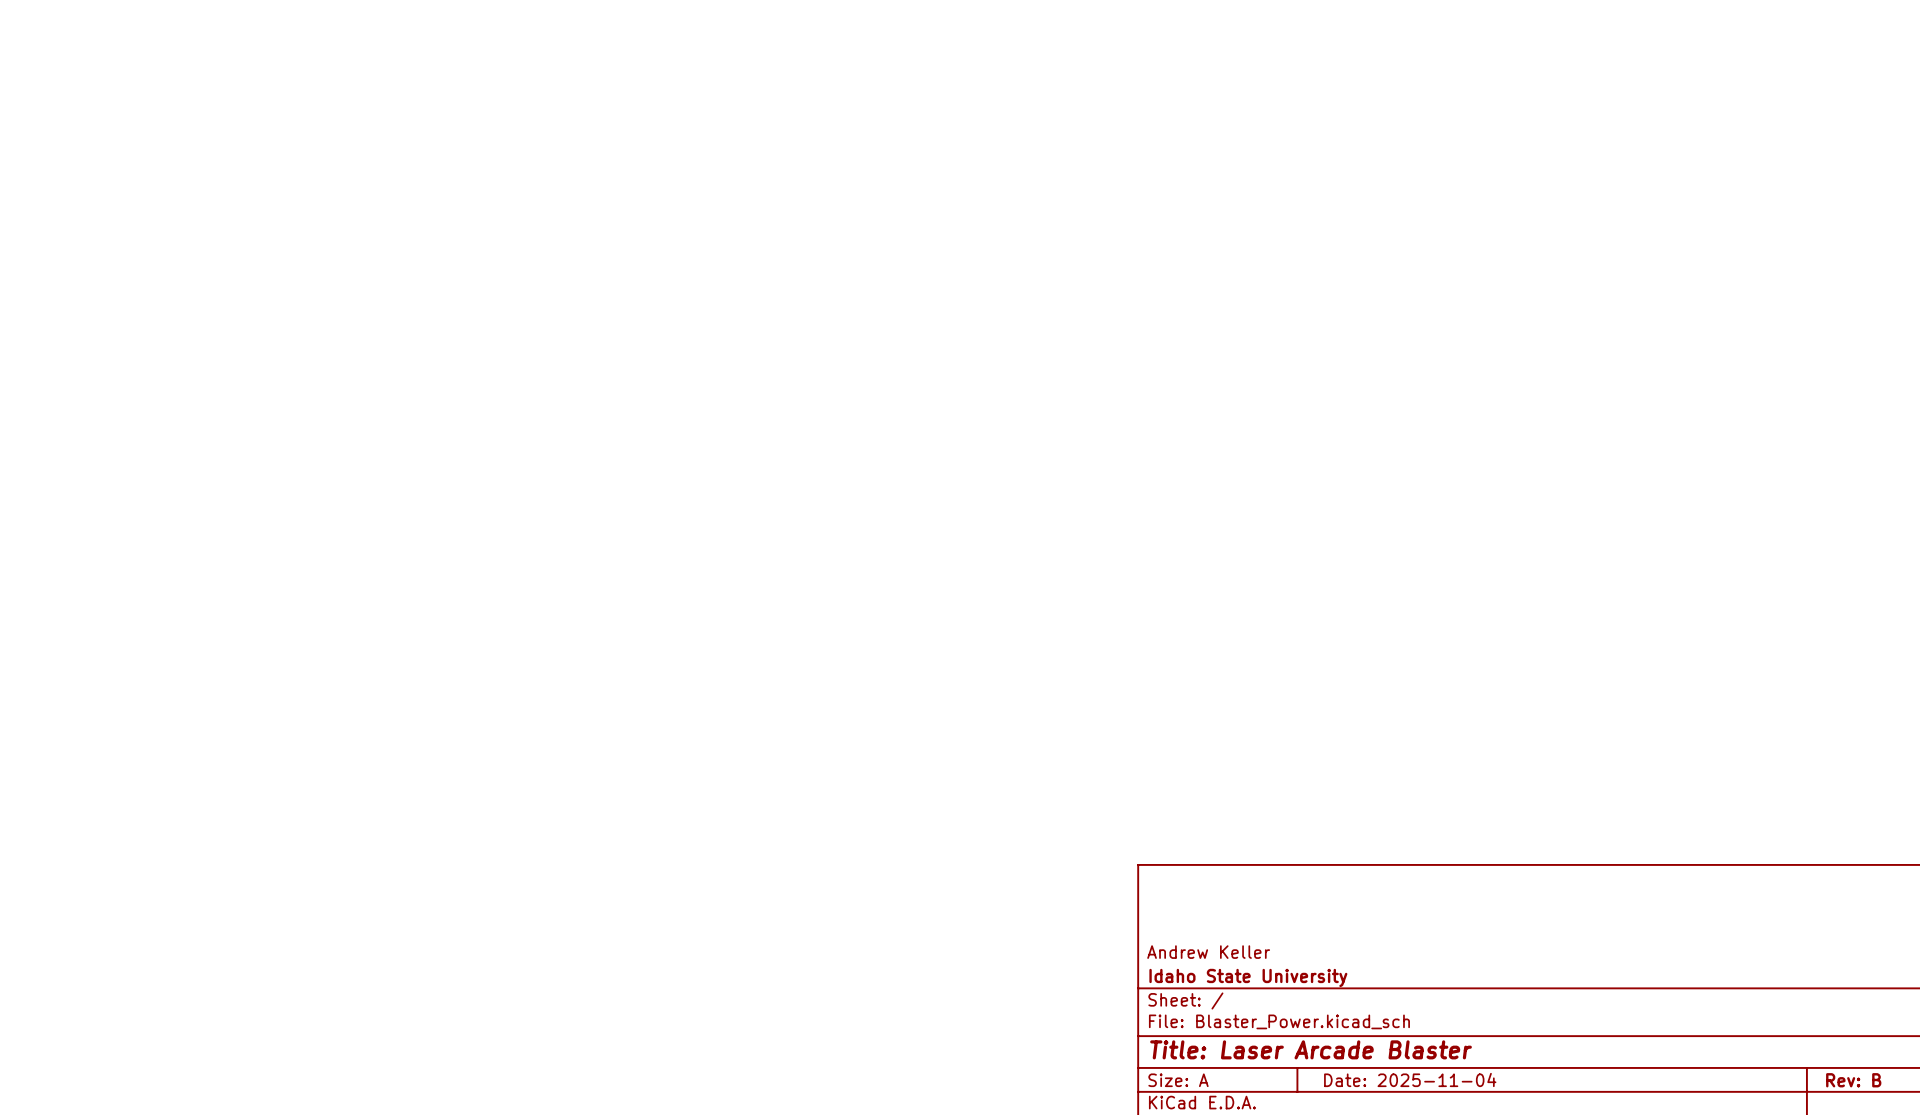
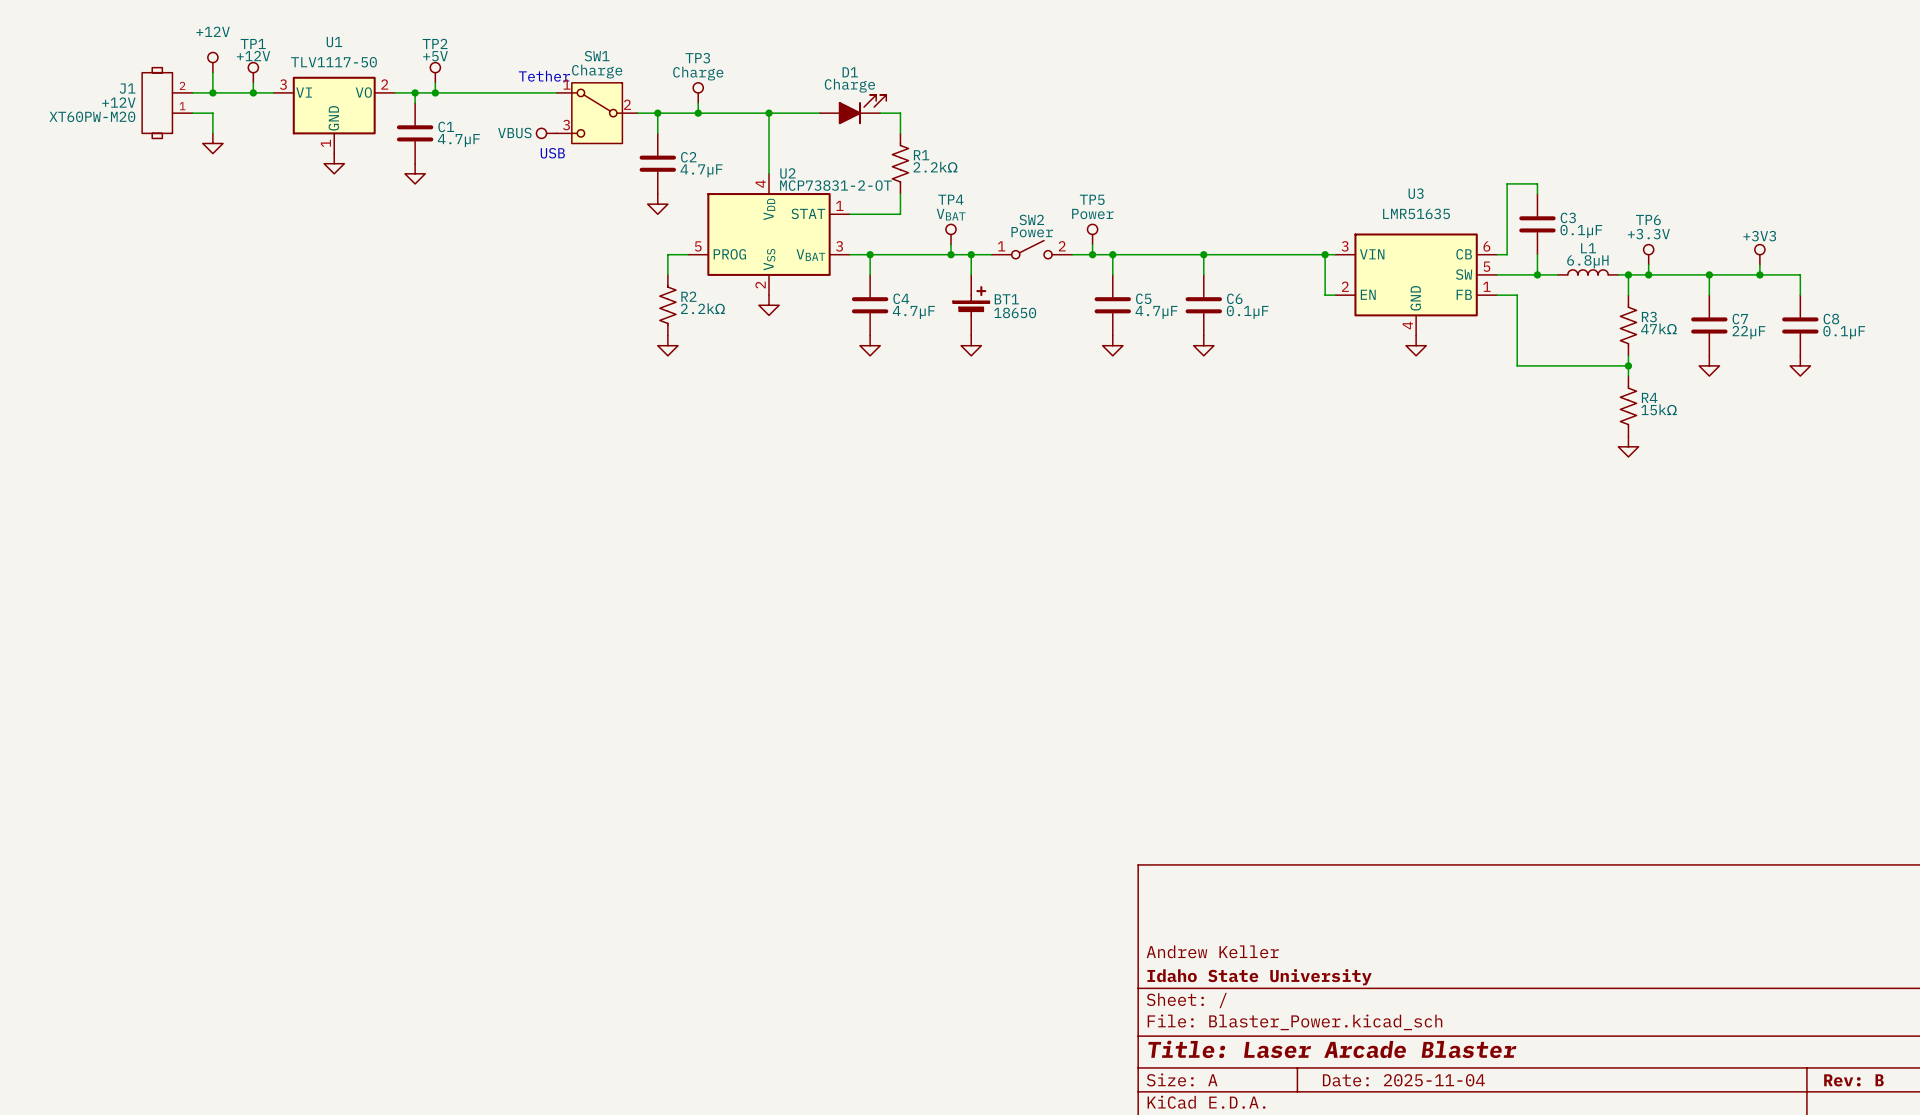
power symbol: none -> +12V (212, 62)
wire: none -> (212, 72) (212, 92)
TP1: none -> +12V (253, 72)
TP2: none -> +5V (435, 72)
text: none -> Tether (544, 76)
wire: none -> (253, 82) (253, 92)
wire: none -> (435, 82) (435, 92)
wire: none -> (192, 92) (273, 92)
junction: none -> (212, 92)
junction: none -> (253, 92)
wire: none -> (394, 92) (556, 92)
wire: none -> (415, 92) (415, 103)
junction: none -> (415, 92)
junction: none -> (435, 92)
TP3: none -> Charge (698, 92)
J1: none -> +12V (167, 103)
wire: none -> (698, 103) (698, 113)
D1: none -> Charge (852, 109)
wire: none -> (192, 113) (212, 113) (212, 133)
SW1: none -> Charge (597, 113)
wire: none -> (637, 113) (819, 113)
wire: none -> (657, 113) (657, 133)
junction: none -> (657, 113)
junction: none -> (698, 113)
wire: none -> (769, 113) (769, 173)
junction: none -> (769, 113)
wire: none -> (880, 113) (900, 113) (900, 133)
U1: none -> TLV1117-50 (334, 115)
C1: none -> 4.7µF (415, 133)
power symbol: none -> VBUS (546, 133)
power symbol: none -> (212, 143)
text: none -> USB (552, 153)
power symbol: none -> (334, 163)
C2: none -> 4.7µF (657, 163)
R1: none -> 2.2kΩ (900, 163)
power symbol: none -> (415, 173)
wire: none -> (900, 194) (900, 214) (849, 214)
wire: none -> (1537, 194) (1537, 183) (1507, 183) (1507, 254) (1497, 254)
power symbol: none -> (657, 204)
C3: none -> 0.1µF (1537, 224)
U2: none -> MCP73831-2-OT (769, 234)
TP4: none -> VBAT (951, 234)
TP5: none -> Power (1092, 234)
wire: none -> (951, 244) (951, 254)
wire: none -> (1092, 244) (1092, 254)
SW2: none -> Power (1031, 249)
wire: none -> (688, 254) (667, 254) (667, 274)
wire: none -> (849, 254) (991, 254)
wire: none -> (870, 254) (870, 274)
junction: none -> (870, 254)
junction: none -> (951, 254)
wire: none -> (971, 254) (971, 274)
junction: none -> (971, 254)
wire: none -> (1072, 254) (1335, 254)
junction: none -> (1092, 254)
wire: none -> (1112, 254) (1112, 274)
junction: none -> (1112, 254)
wire: none -> (1203, 254) (1203, 274)
junction: none -> (1203, 254)
wire: none -> (1325, 254) (1325, 295) (1335, 295)
junction: none -> (1325, 254)
wire: none -> (1537, 254) (1537, 274)
TP6: none -> +3.3V (1648, 254)
power symbol: none -> +3V3 (1759, 254)
wire: none -> (1648, 264) (1648, 274)
wire: none -> (1759, 264) (1759, 274)
L1: none -> 6.8µH (1588, 272)
wire: none -> (1497, 274) (1557, 274)
junction: none -> (1537, 274)
wire: none -> (1618, 274) (1800, 274) (1800, 295)
wire: none -> (1628, 274) (1628, 295)
junction: none -> (1628, 274)
junction: none -> (1648, 274)
wire: none -> (1709, 274) (1709, 295)
junction: none -> (1709, 274)
junction: none -> (1759, 274)
U3: none -> LMR51635 (1416, 284)
wire: none -> (1497, 295) (1517, 295) (1517, 365) (1628, 365)
R2: none -> 2.2kΩ (667, 305)
power symbol: none -> (769, 305)
C4: none -> 4.7µF (870, 305)
BT1: none -> 18650 (971, 305)
C5: none -> 4.7µF (1112, 305)
C6: none -> 0.1µF (1203, 305)
R3: none -> 47kΩ (1628, 325)
C7: none -> 22µF (1709, 325)
C8: none -> 0.1µF (1800, 325)
power symbol: none -> (667, 345)
power symbol: none -> (870, 345)
power symbol: none -> (971, 345)
power symbol: none -> (1112, 345)
power symbol: none -> (1203, 345)
power symbol: none -> (1416, 345)
wire: none -> (1628, 355) (1628, 376)
junction: none -> (1628, 365)
power symbol: none -> (1709, 365)
power symbol: none -> (1800, 365)
R4: none -> 15kΩ (1628, 406)
power symbol: none -> (1628, 446)

